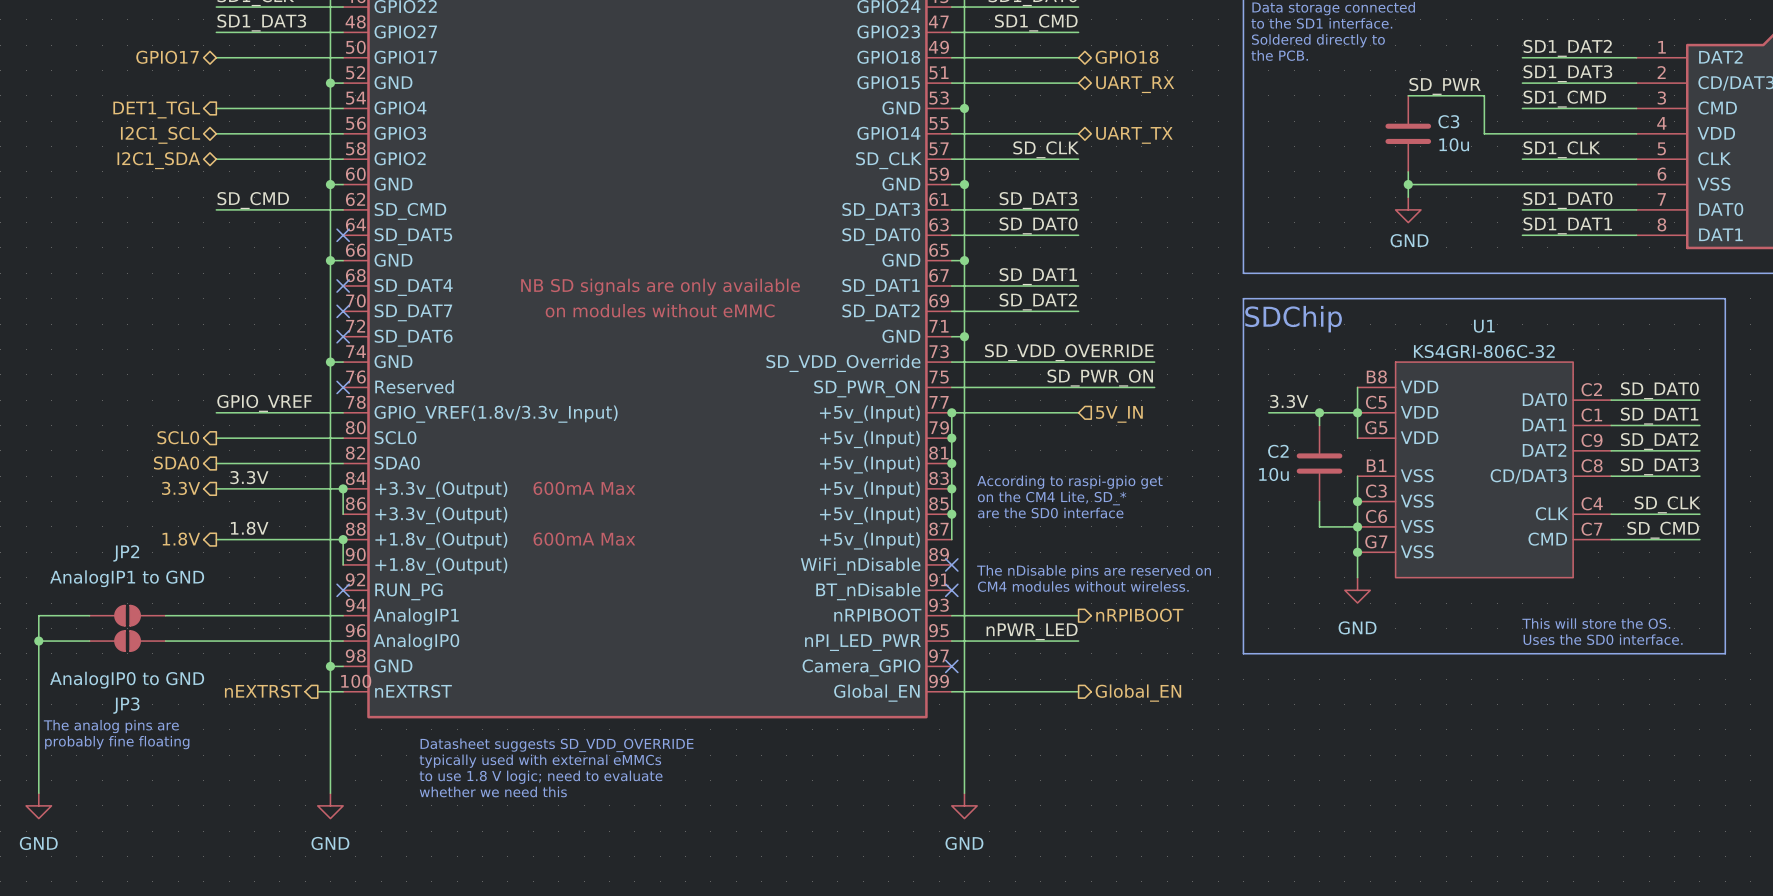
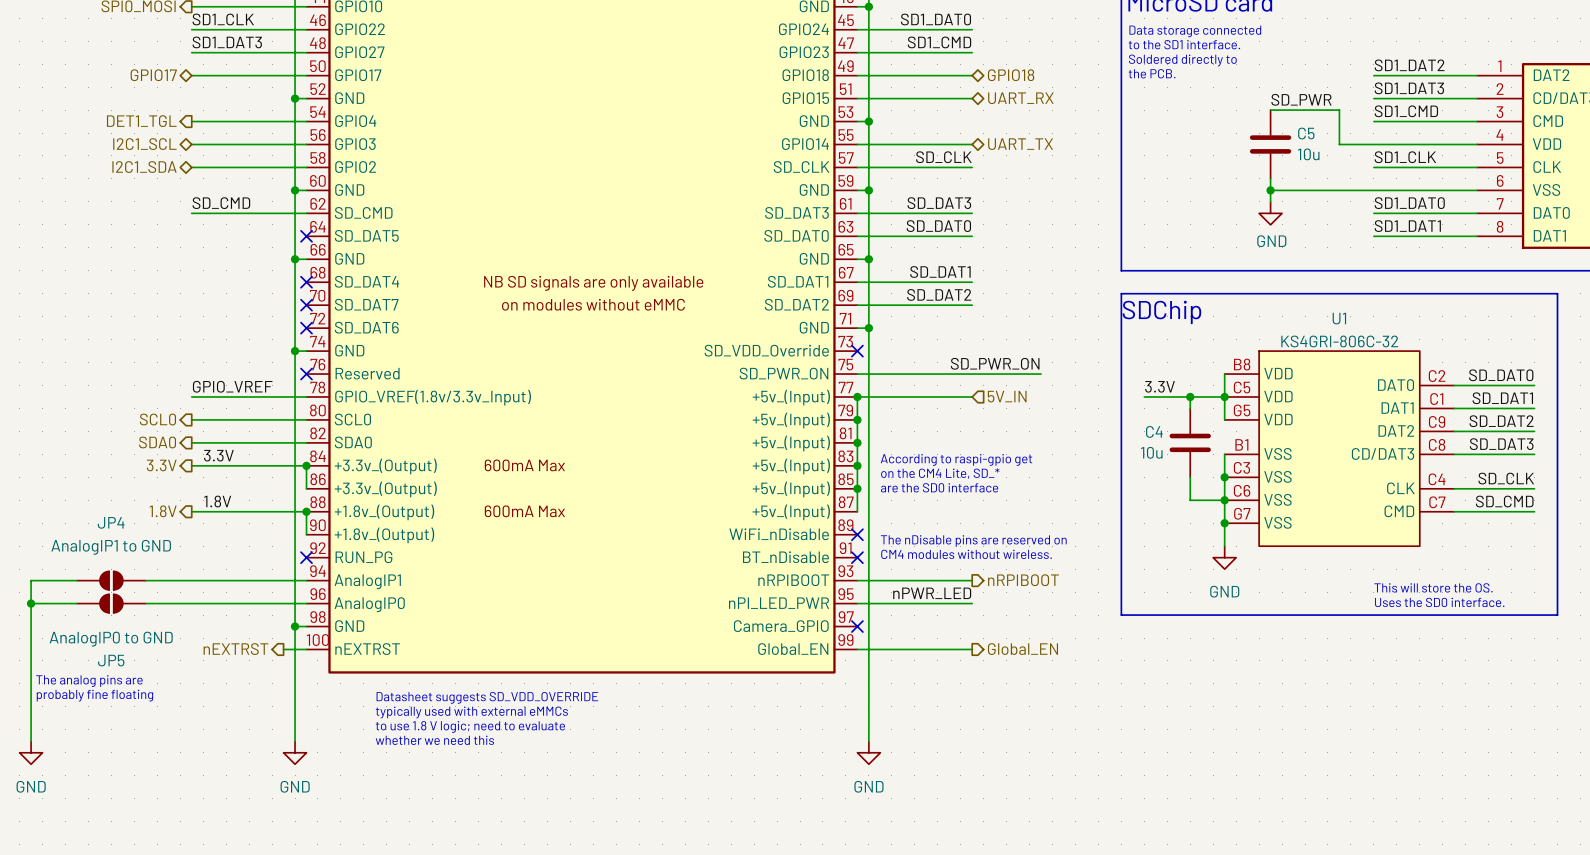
C3 name: C3 (1448, 121) -> C5 (1306, 133)
label: SD_VDD_OVERRIDE (1069, 352) -> none
wire: (951, 362) (1154, 362) -> none
no-connect mark: none -> (857, 351)
C2 name: C2 (1278, 451) -> C4 (1154, 431)
JP2 name: JP2 (126, 553) -> JP4 (111, 522)
JP3 name: JP3 (126, 705) -> JP5 (111, 660)

